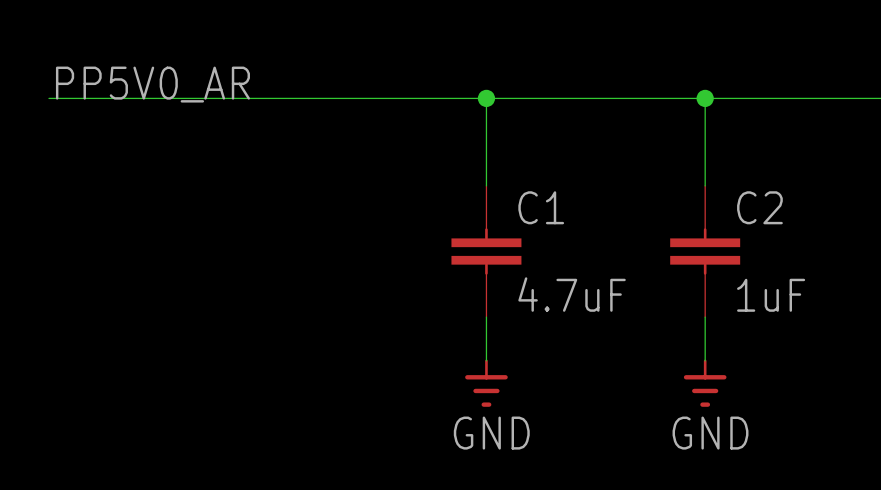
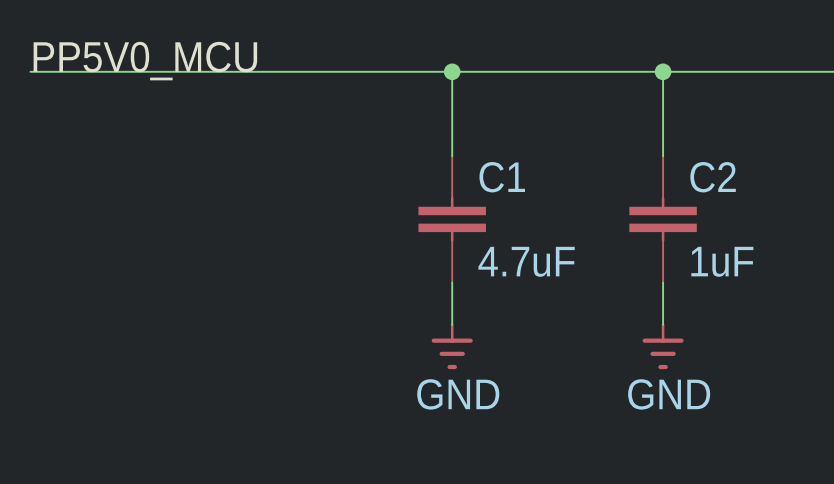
label: PP5V0_AR (152, 84) -> PP5V0_MCU (145, 61)

